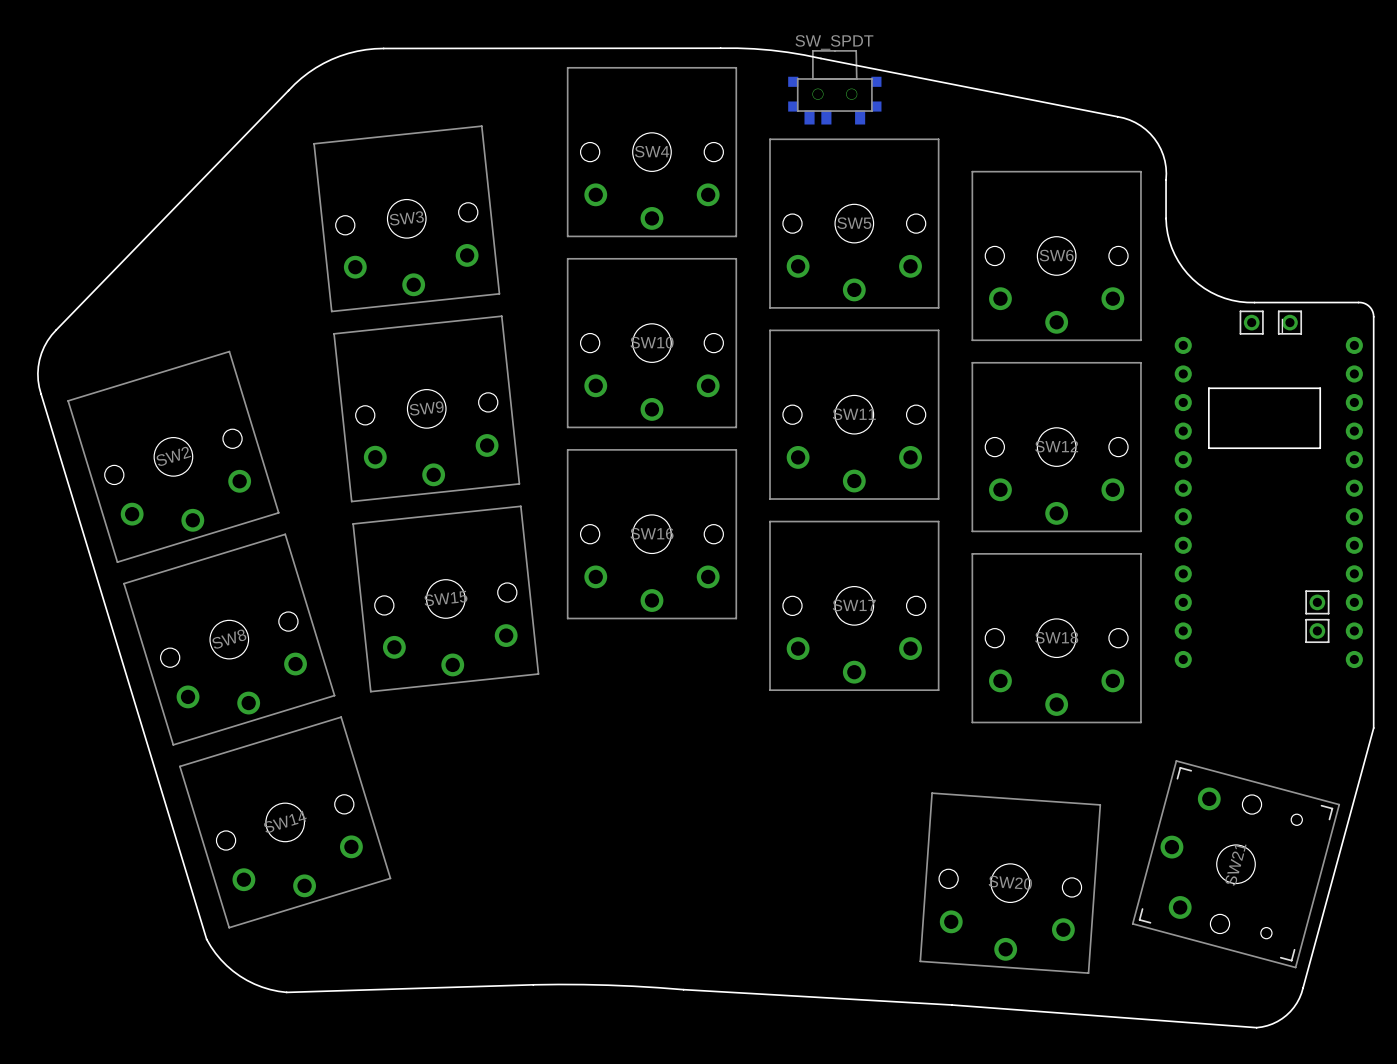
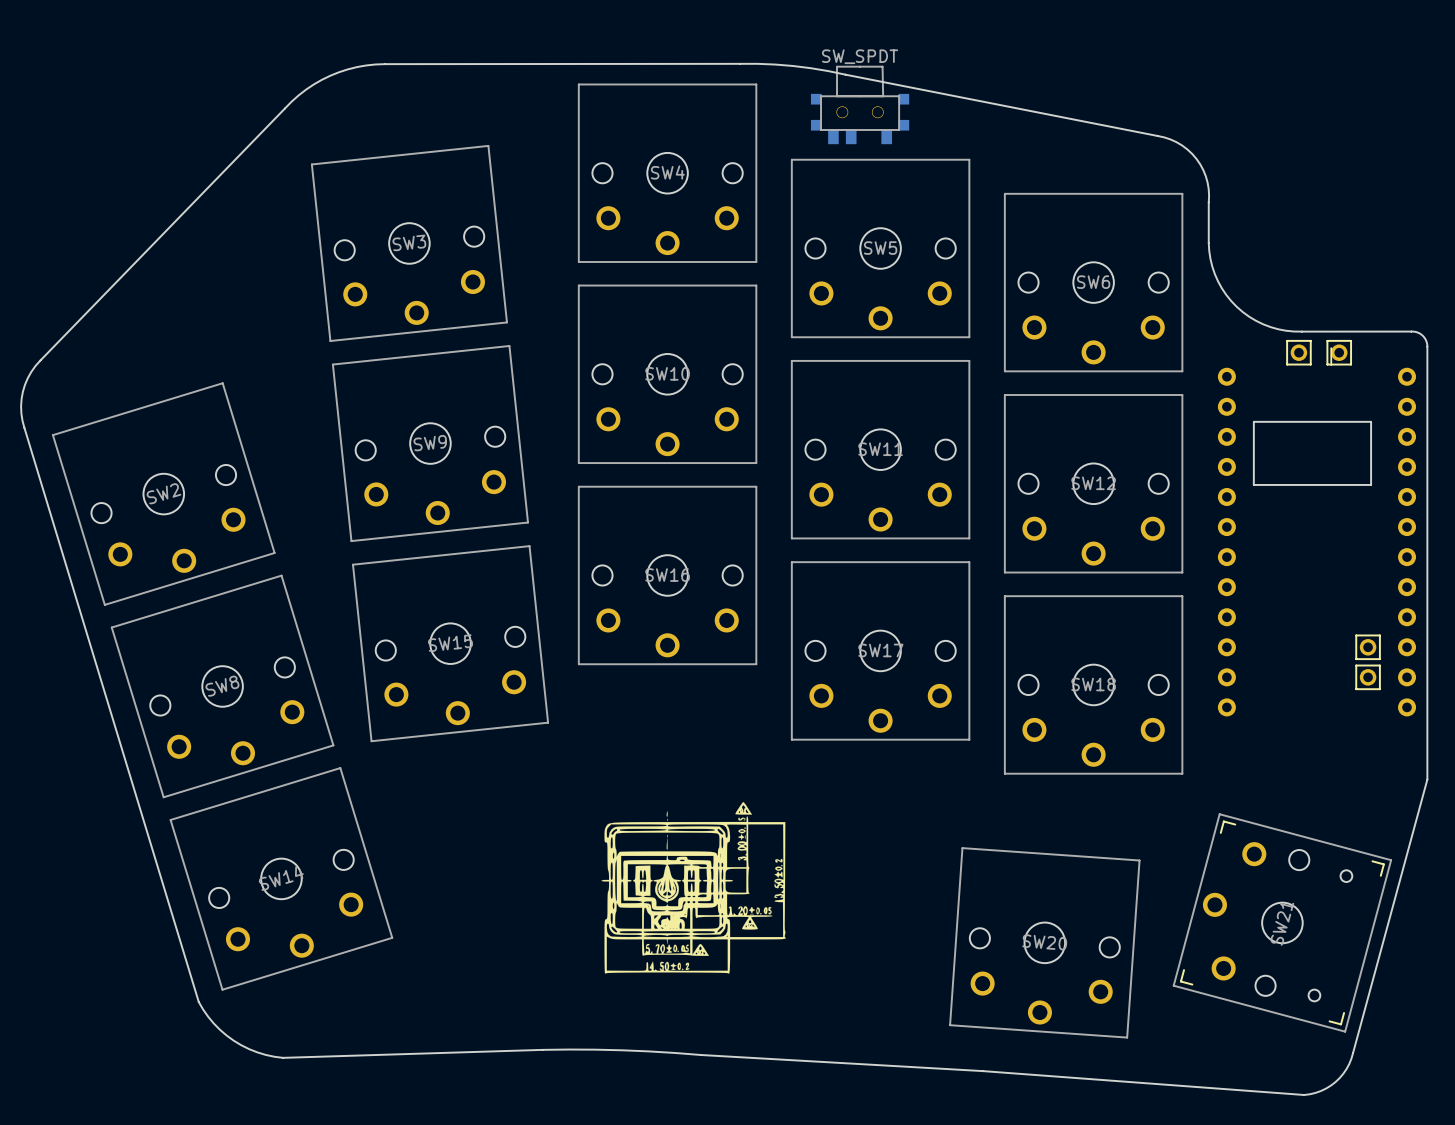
drawing: none -> [601, 801, 786, 974]

